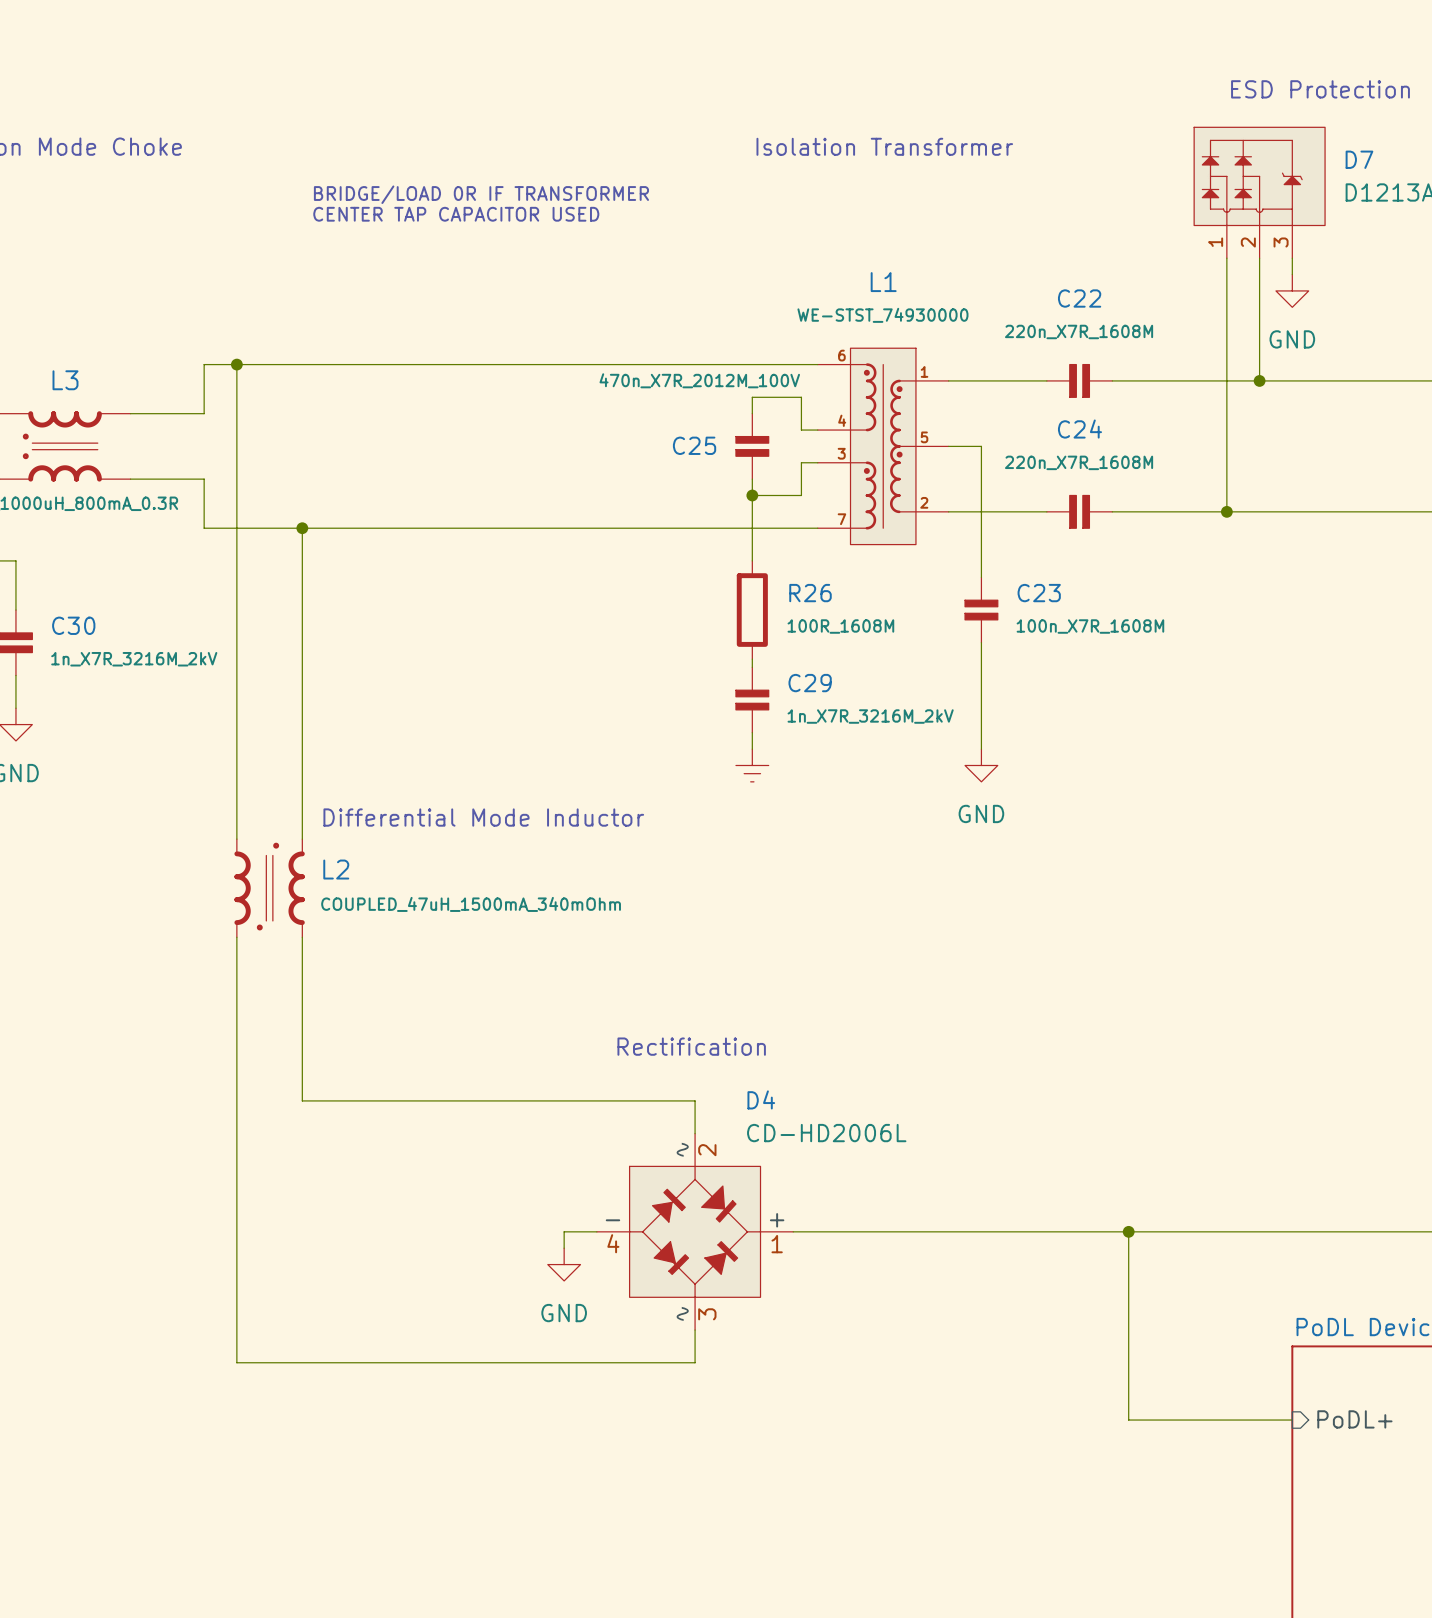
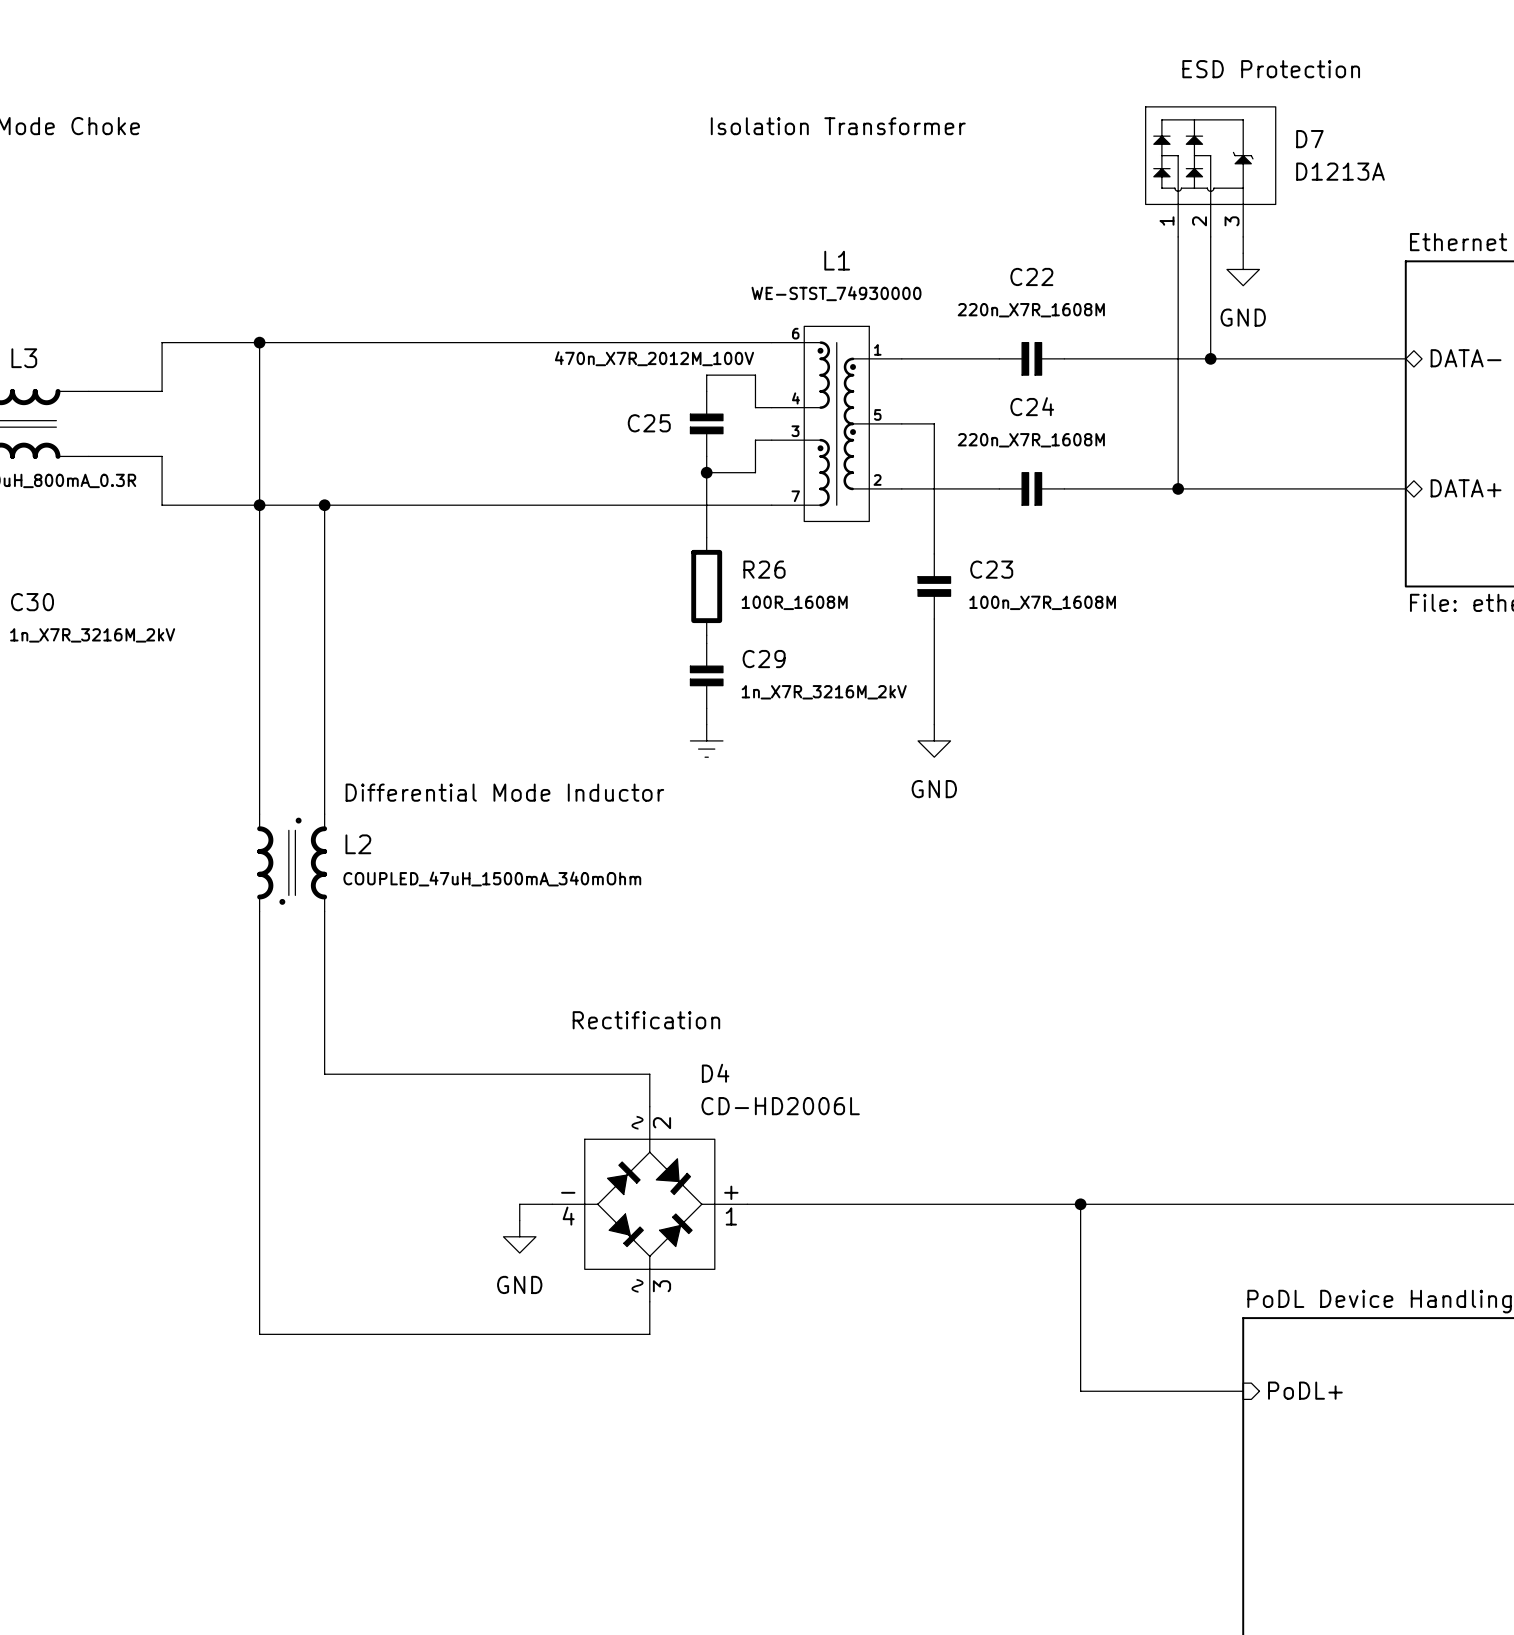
text: BRIDGE/LOAD 0R IF TRANSFORMER (481, 194) -> none
text: CENTER TAP CAPACITOR USED (456, 214) -> none
wire: (236, 364) (236, 839) -> none
junction position: (236, 364) -> (259, 342)
wire: none -> (259, 342) (259, 505)
wire: none -> (324, 505) (324, 814)
junction: none -> (324, 505)
text position: Differential Mode Inductor (483, 817) -> Differential Mode Inductor (504, 792)
L2 position: (269, 888) -> (292, 862)
wire: (236, 937) (236, 1362) (302, 1362) -> (259, 1074) (259, 1334)
wire: (302, 1100) (367, 1100) -> (324, 911) (324, 1074)

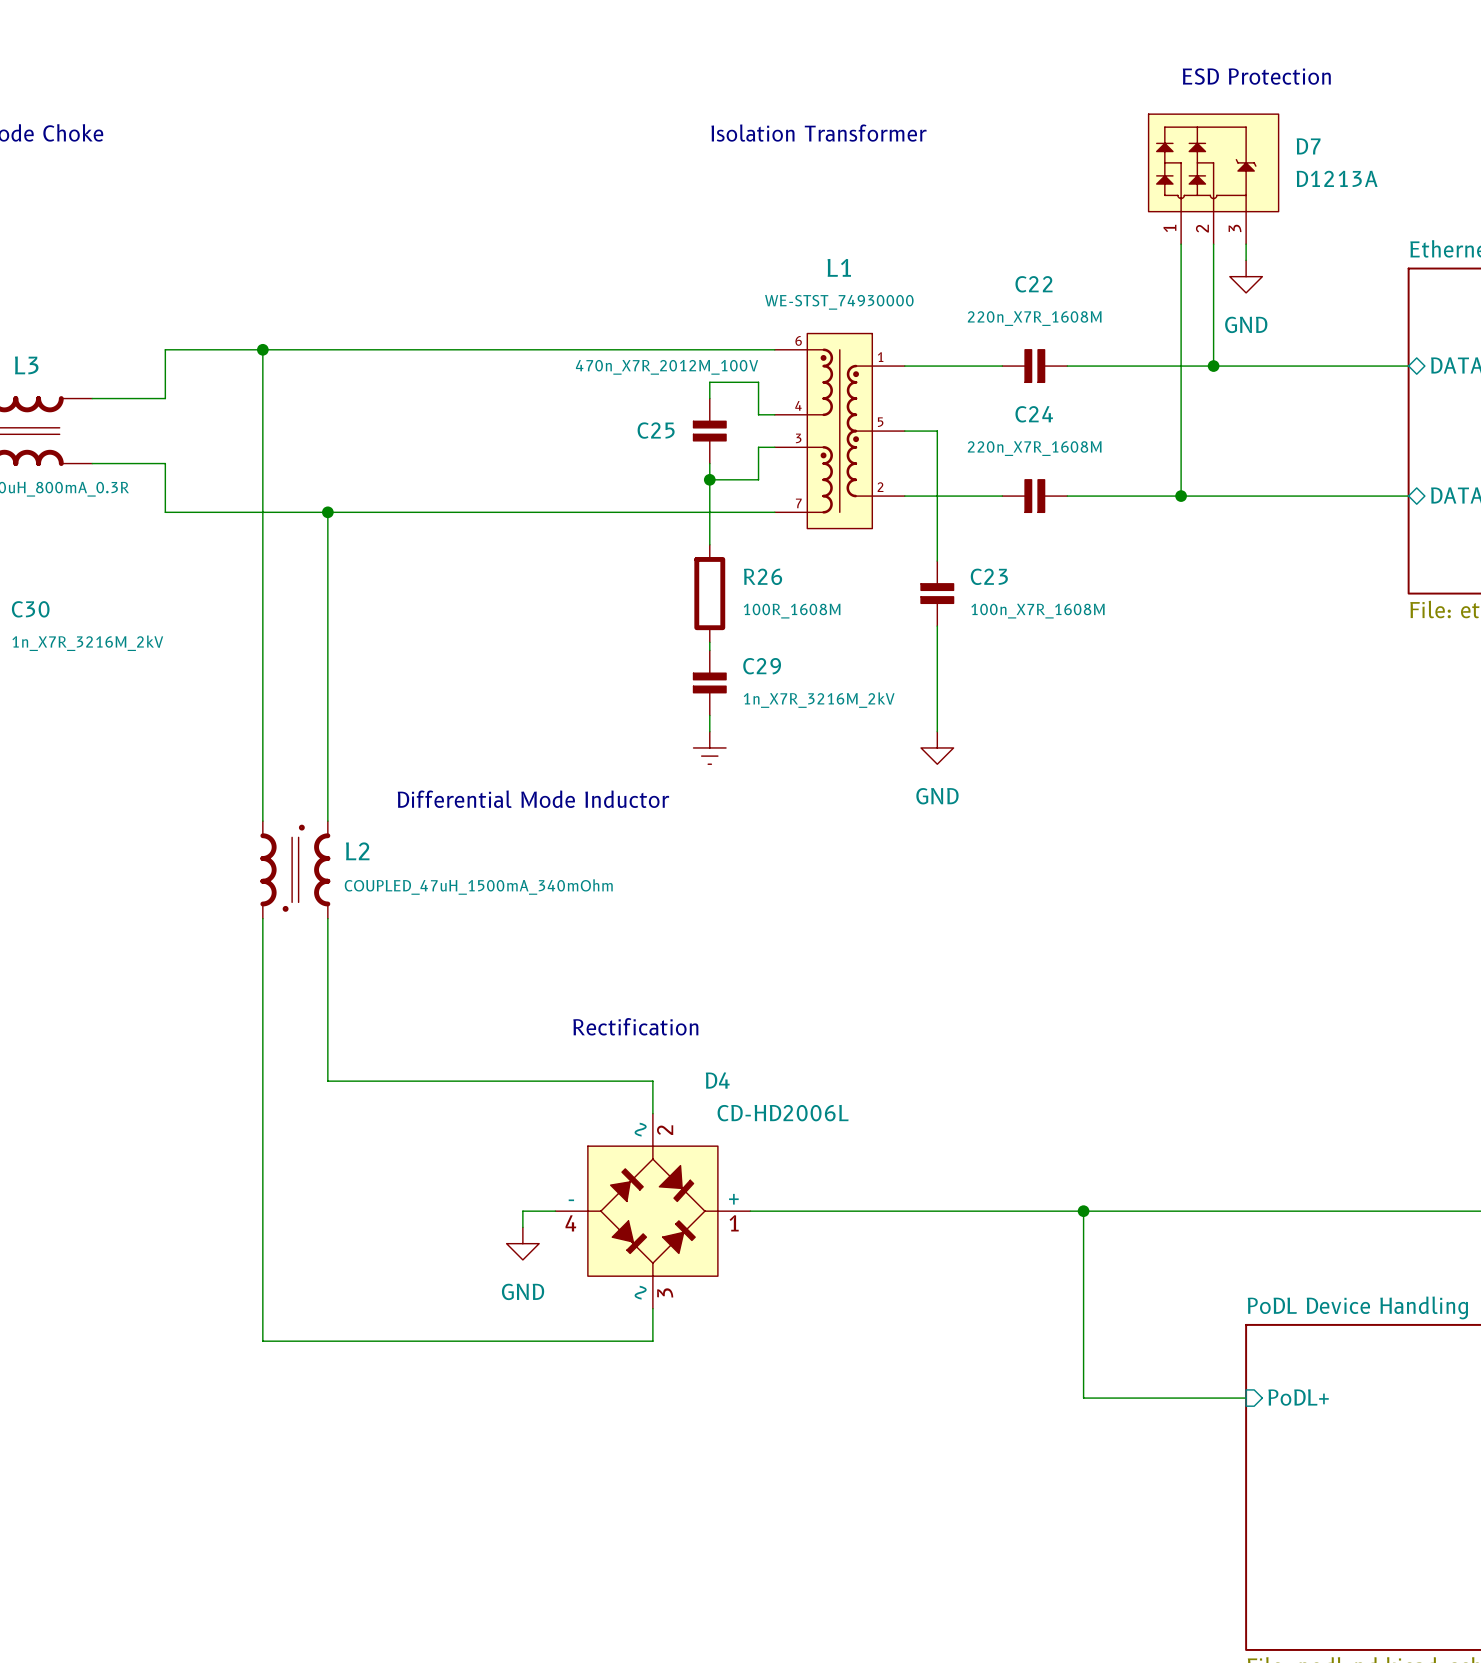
junction: (259, 505) -> none

